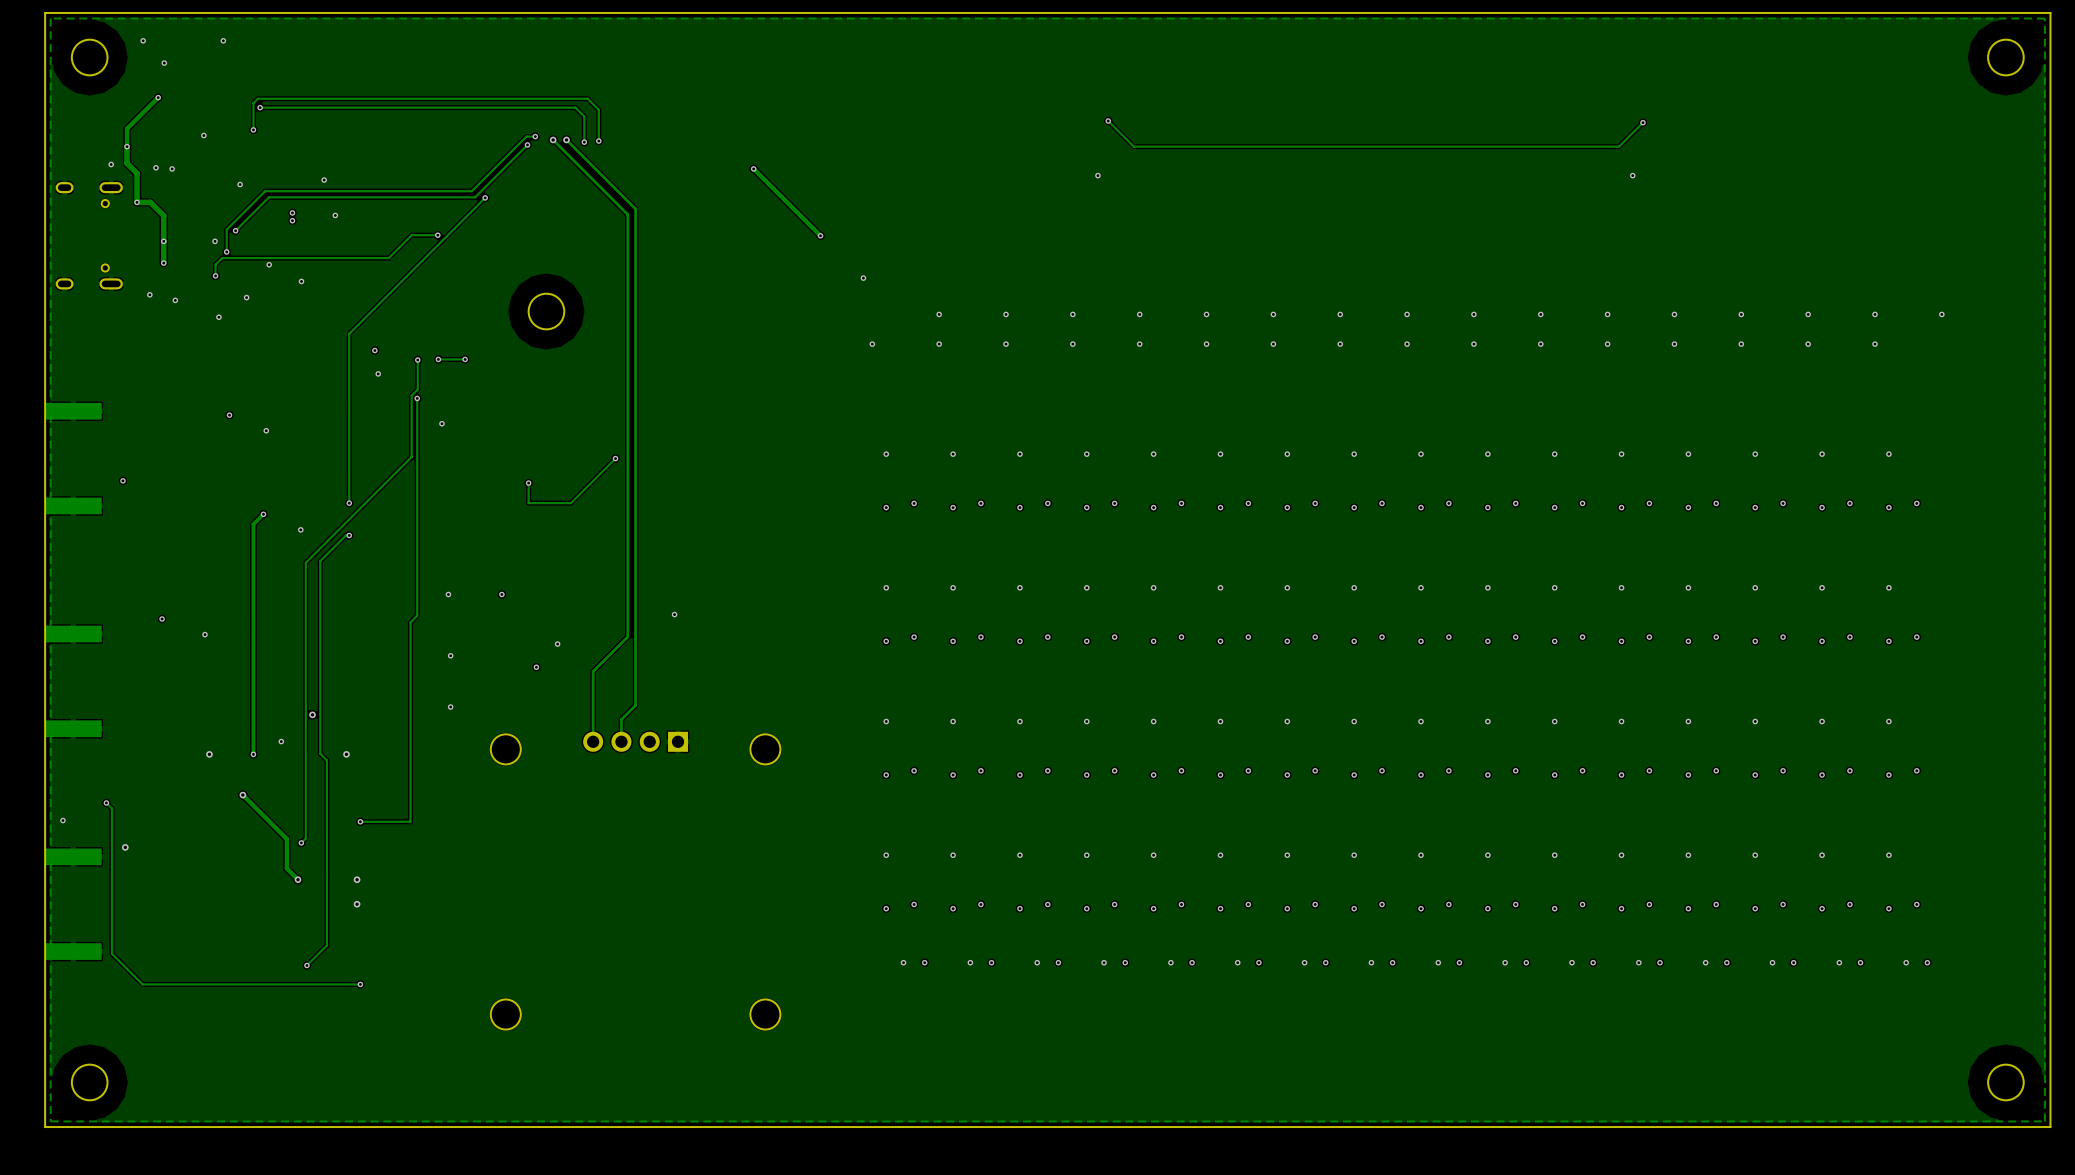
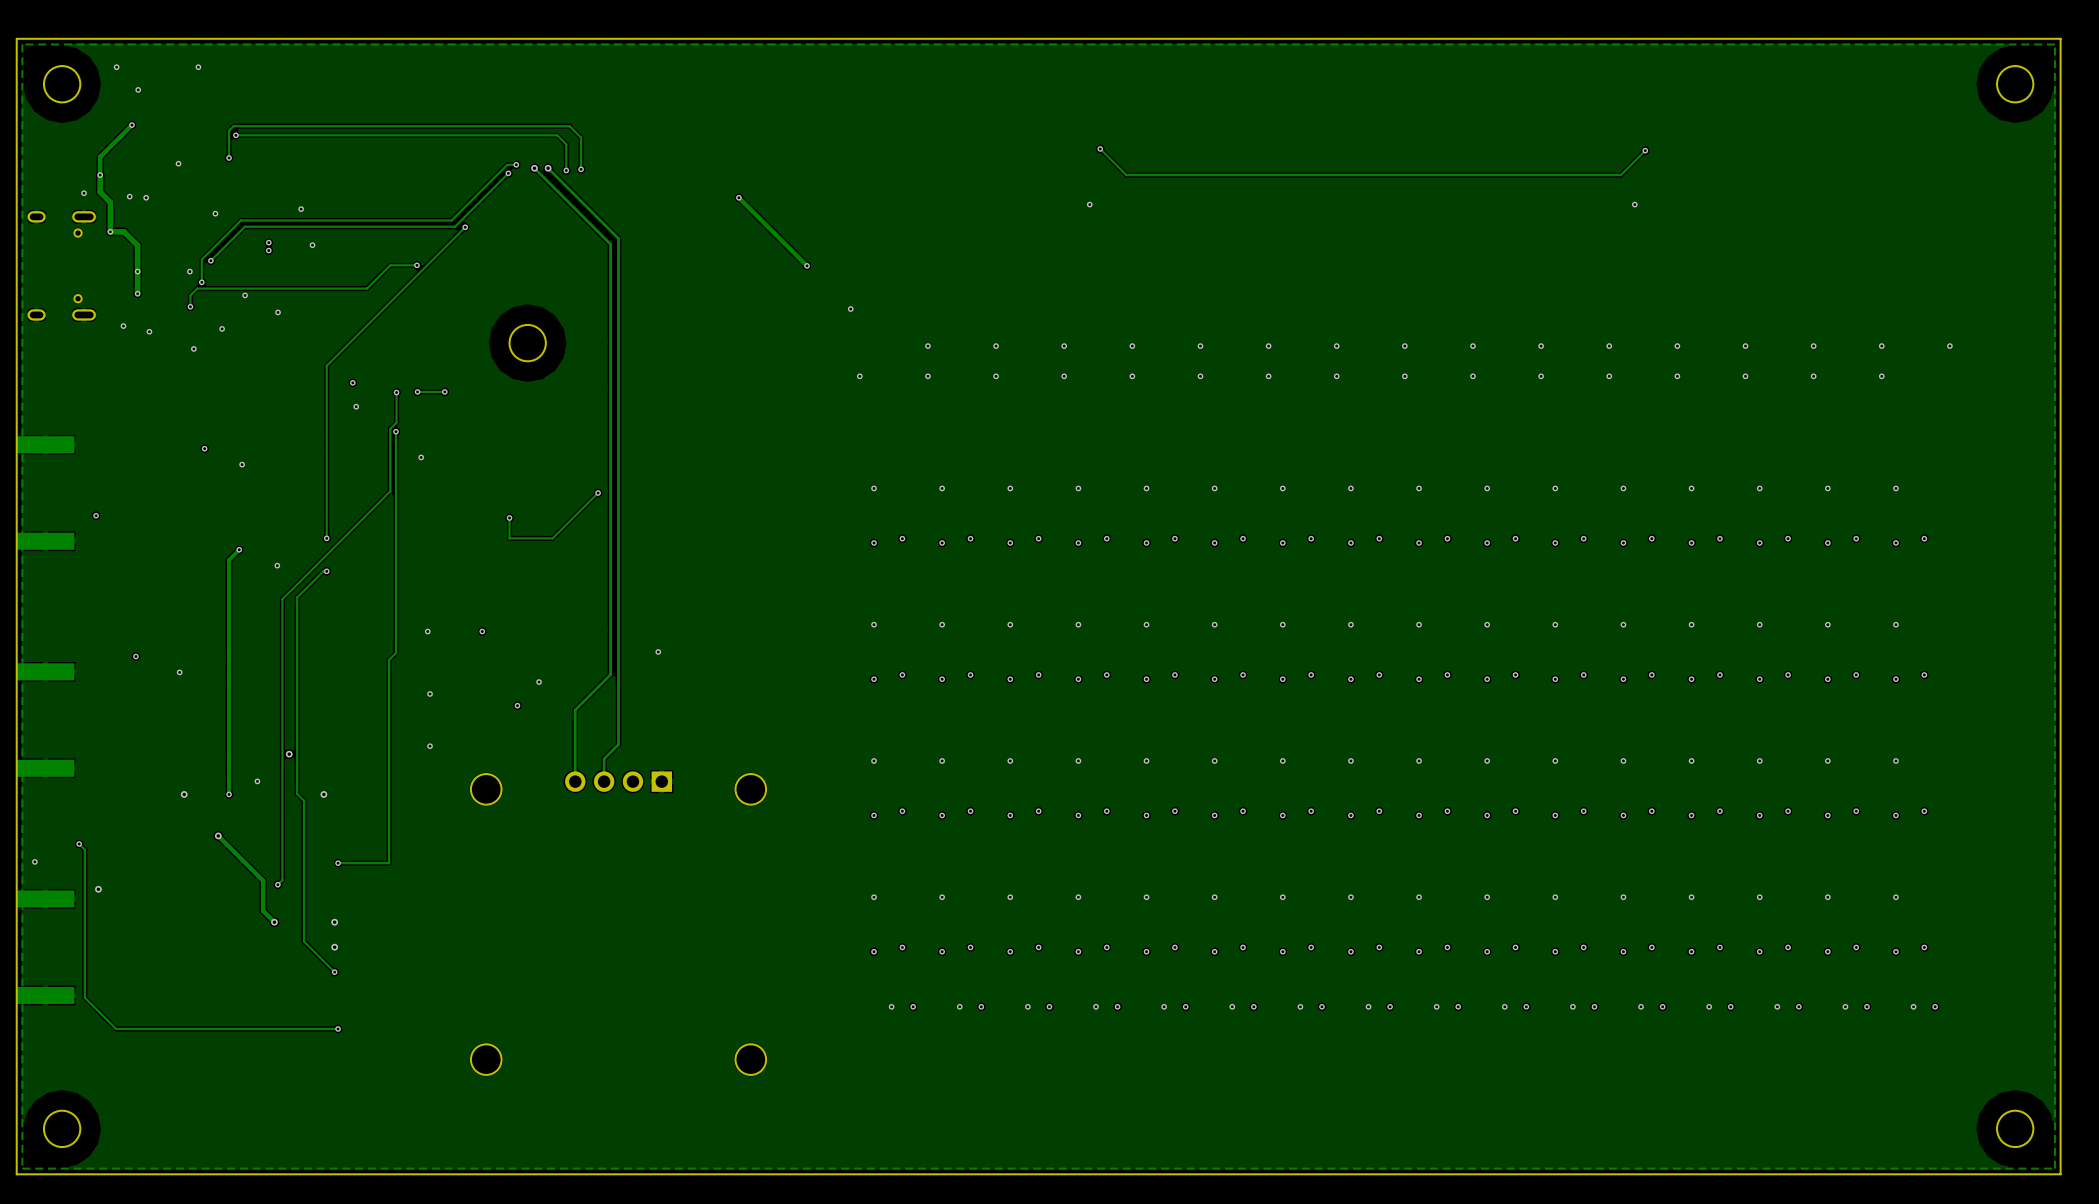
track: (326, 898) (326, 945) (306, 965) -> (304, 941) (334, 972)
via position: (306, 965) -> (334, 972)

